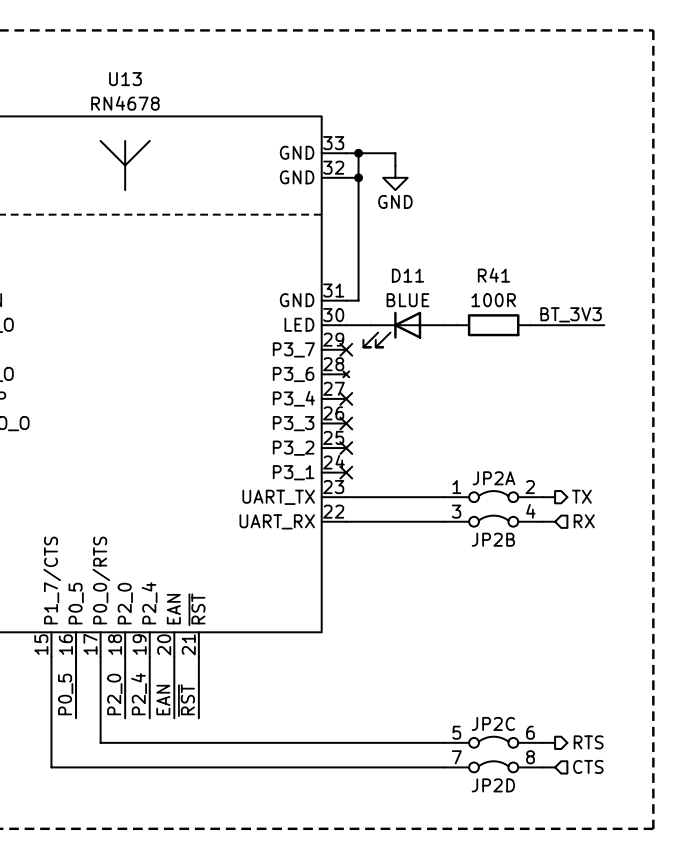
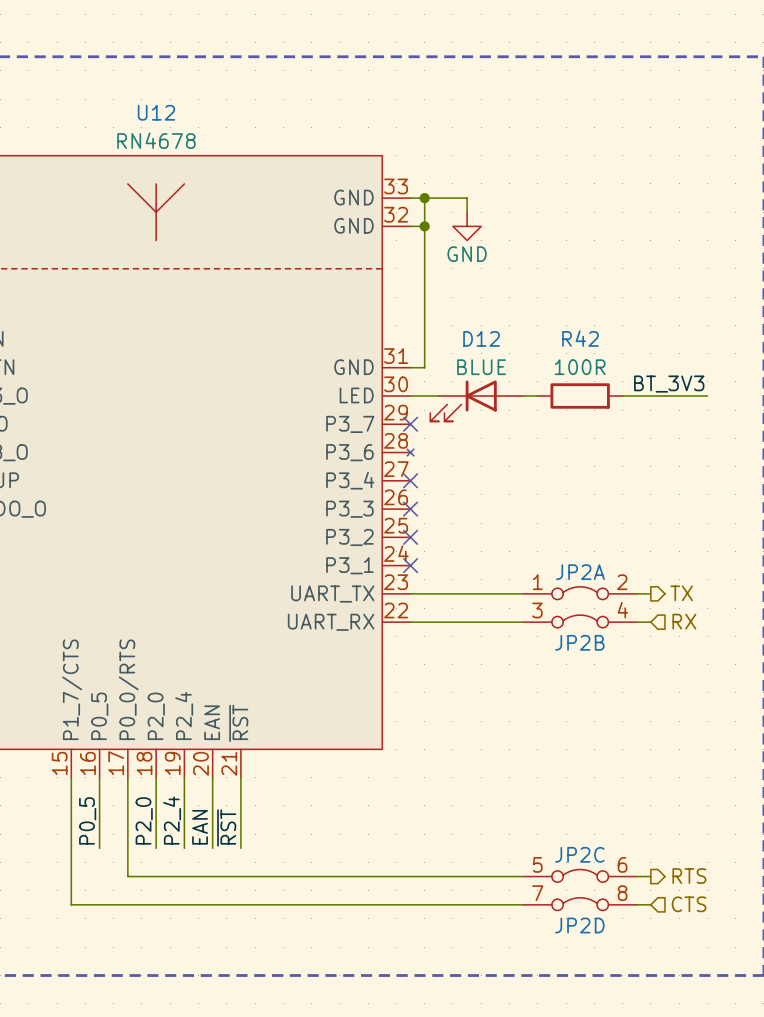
U13 name: U13 (125, 79) -> U12 (156, 112)
D11 name: D11 (407, 275) -> D12 (481, 338)
R41 name: R41 (493, 275) -> R42 (580, 338)

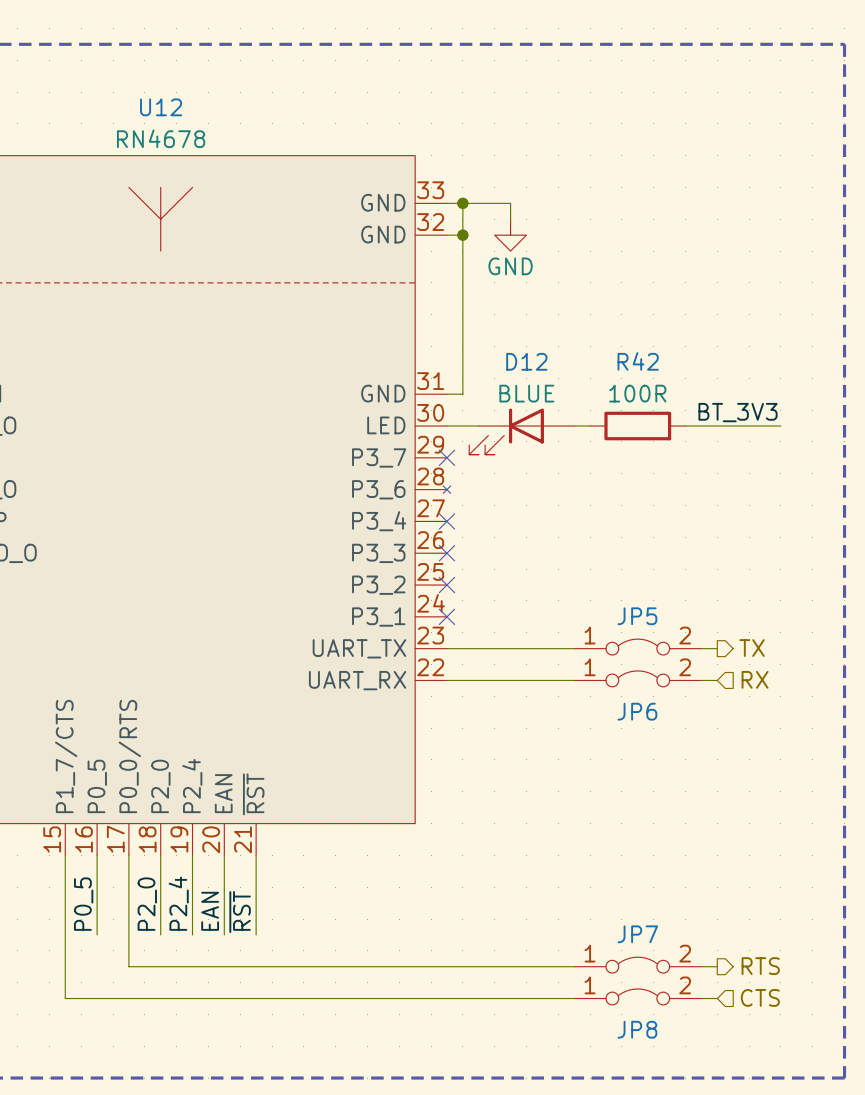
JP5: none -> (637, 647)
JP2A: (580, 593) -> none
JP6: none -> (637, 678)
JP2B: (580, 621) -> none
JP2C: (580, 875) -> none
JP7: none -> (637, 965)
JP8: none -> (637, 996)
JP2D: (580, 904) -> none

